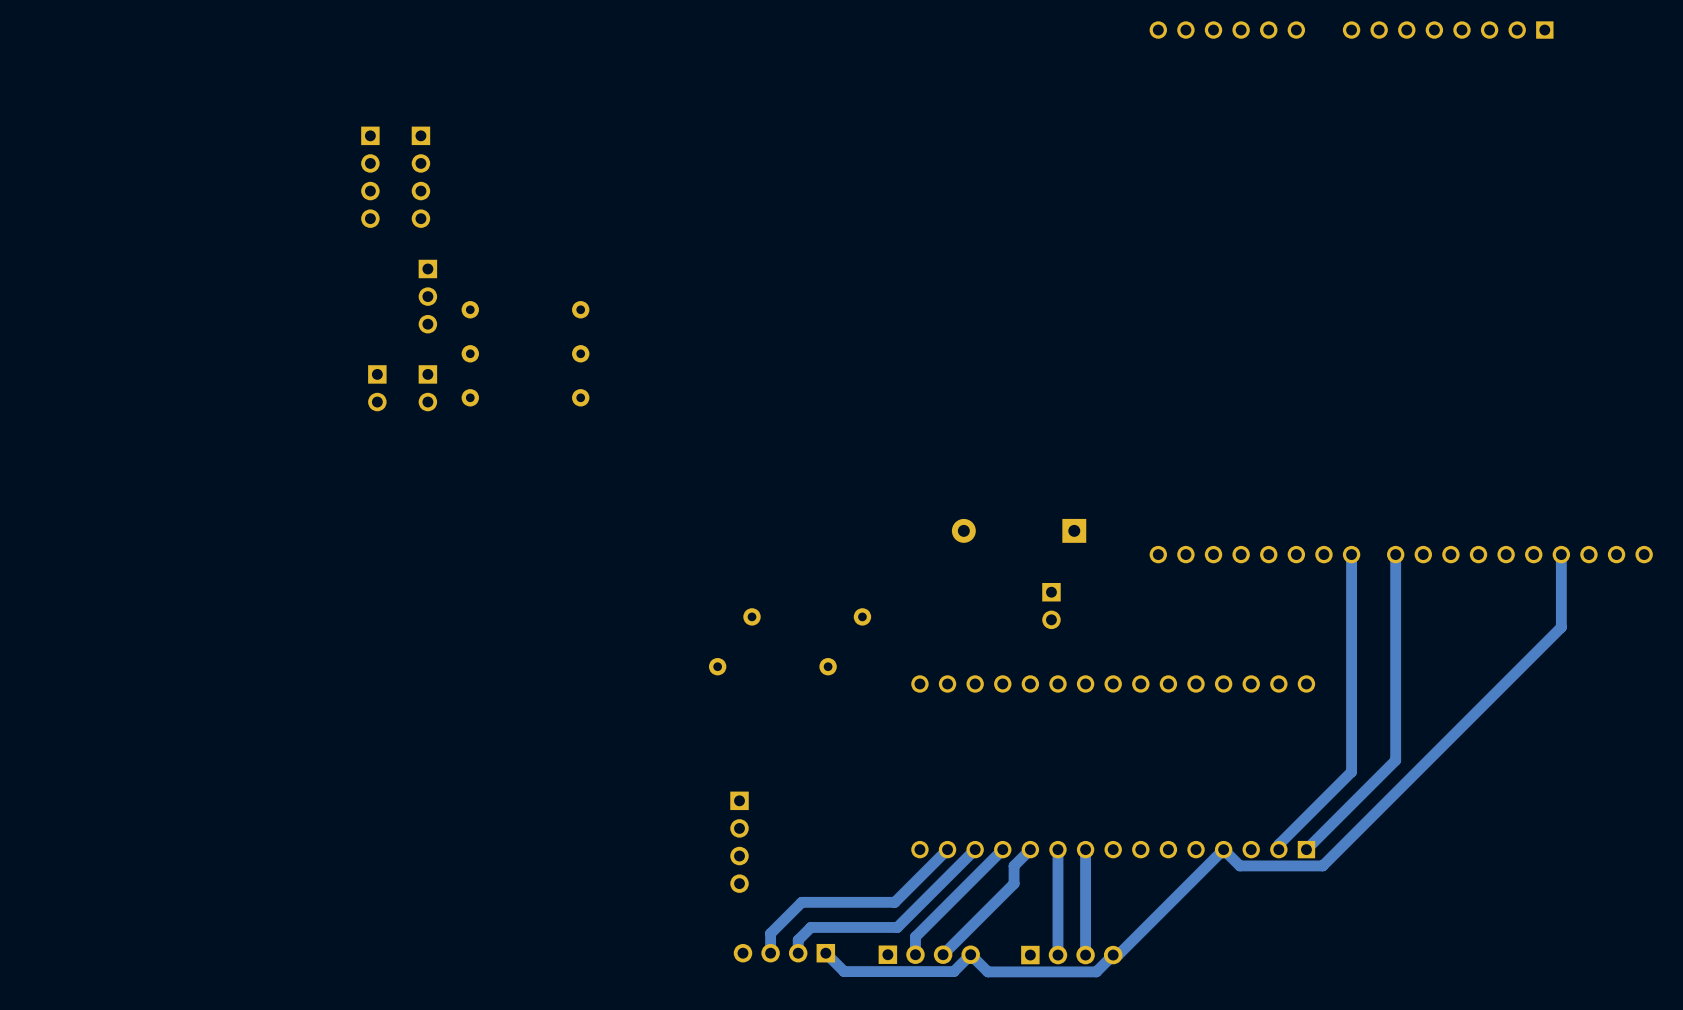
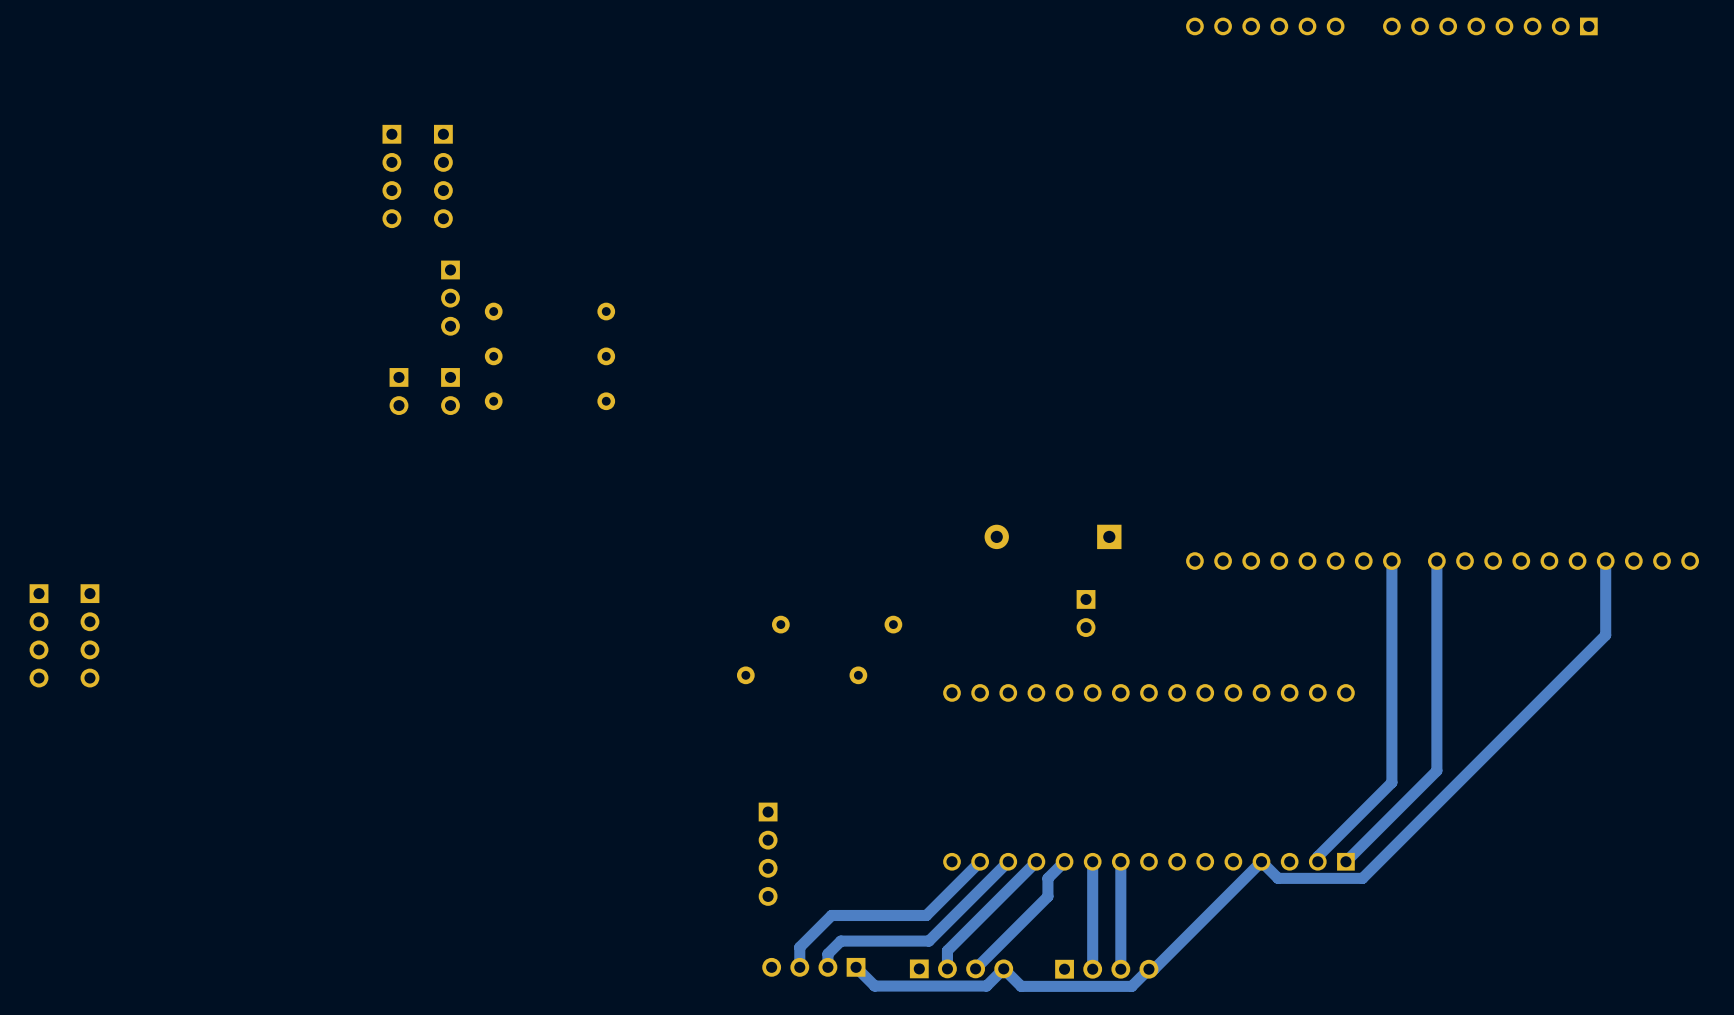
part: none -> (39, 635)
part: none -> (89, 635)

